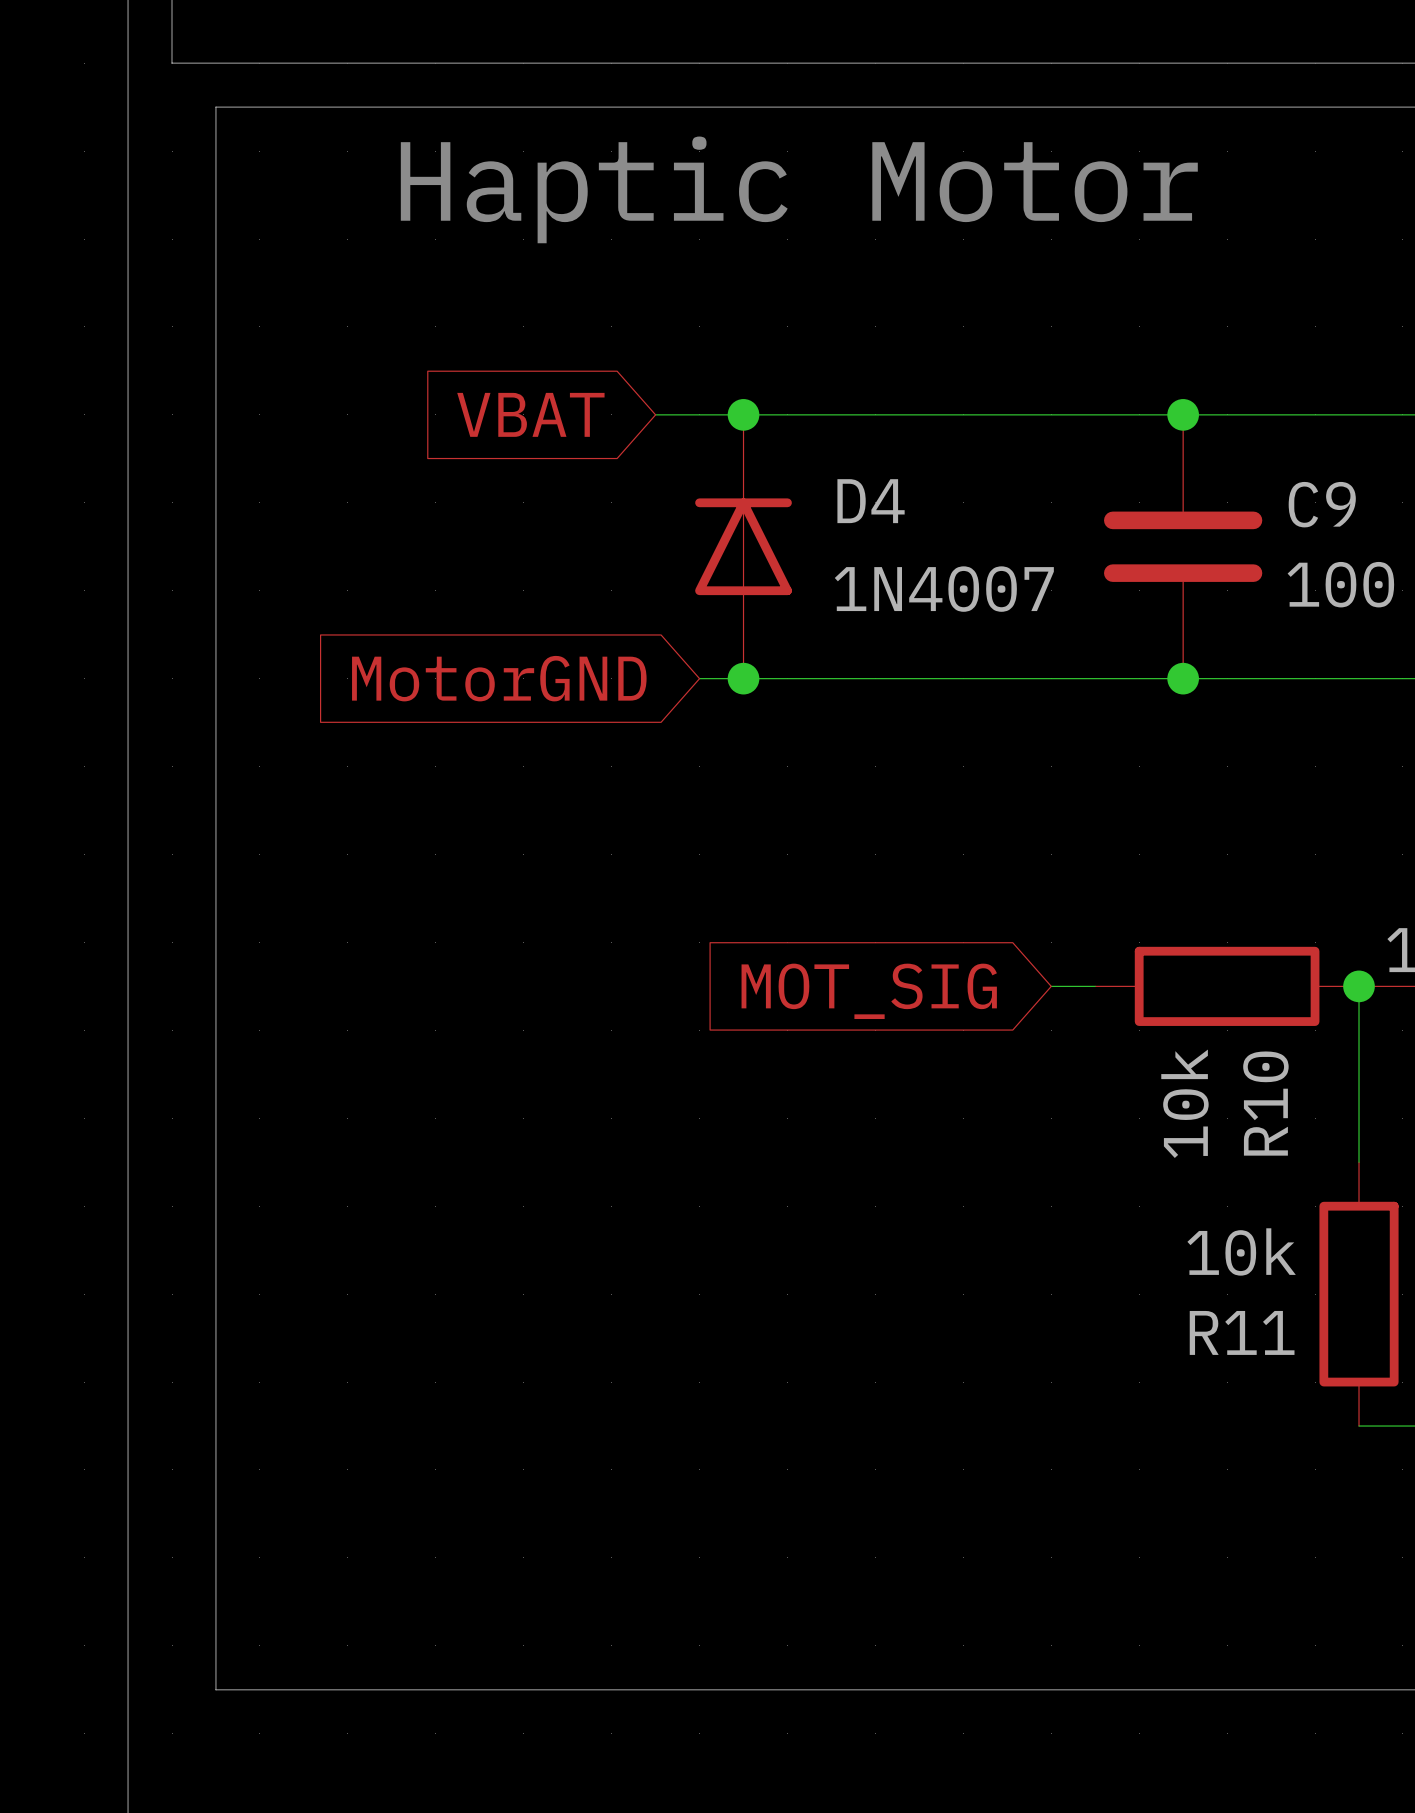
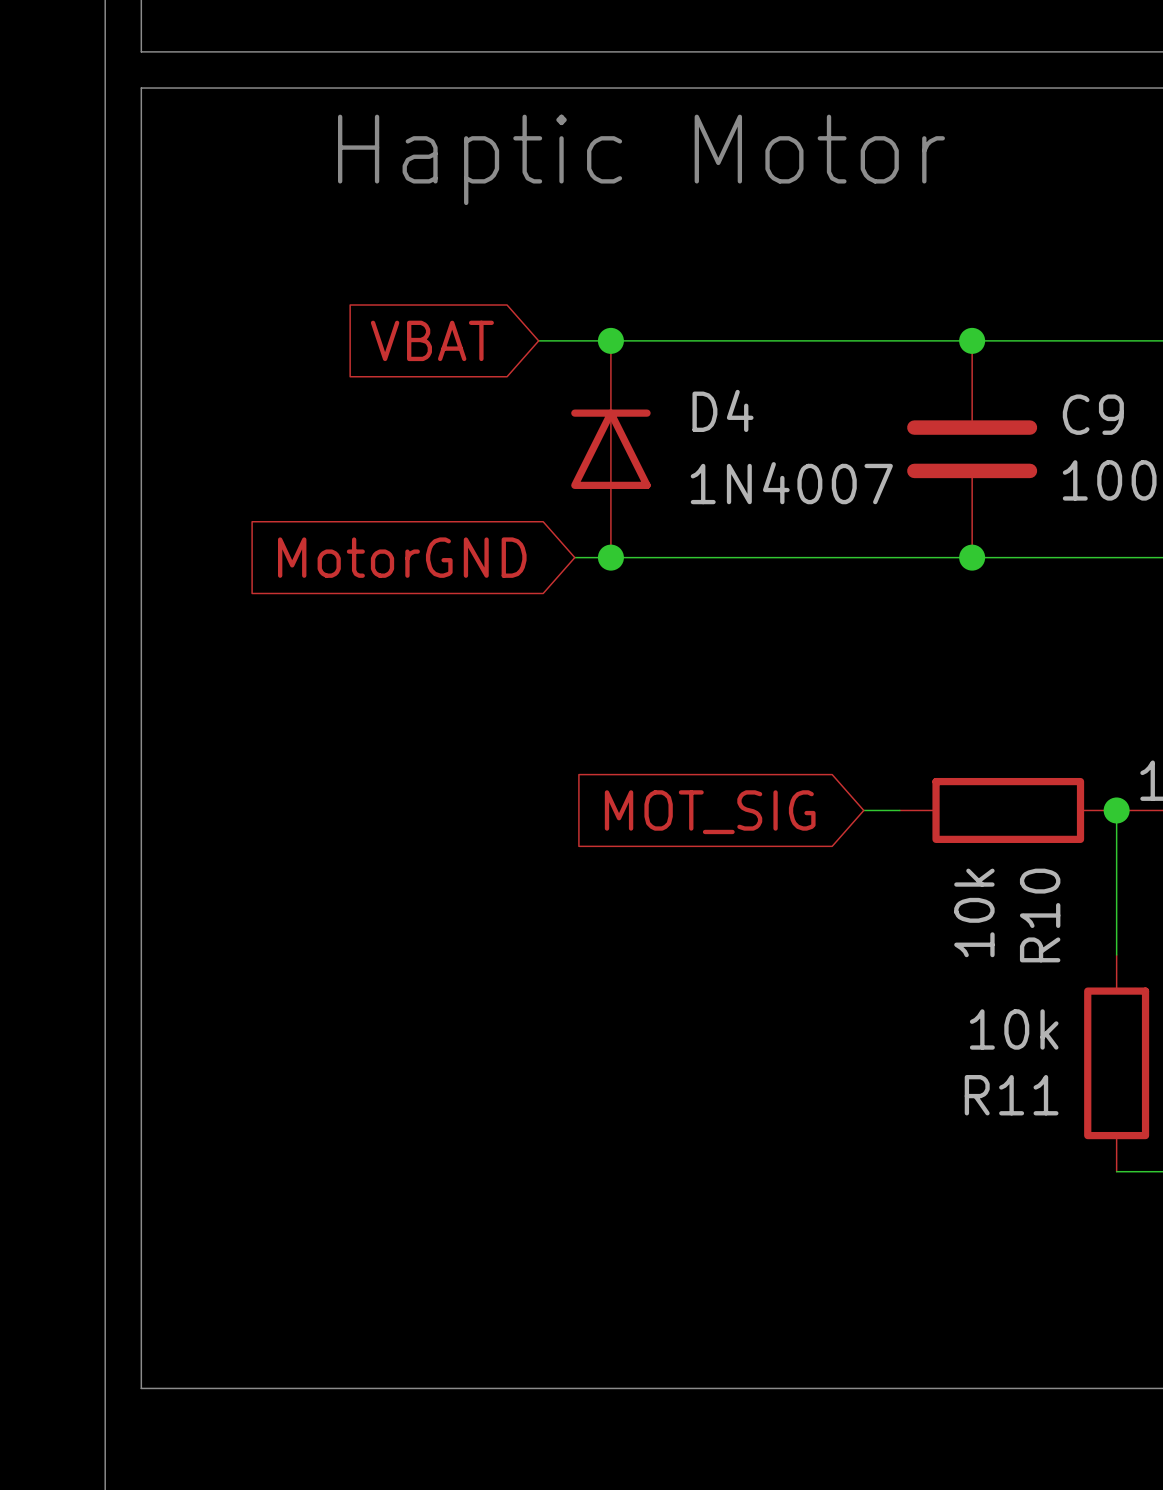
line: (215, 107) (215, 1689) -> (177, 88) (141, 88) (141, 1388) (177, 1388)

